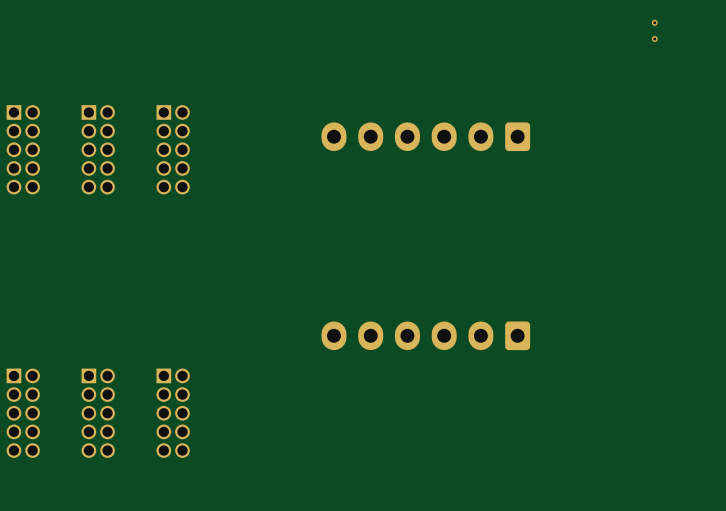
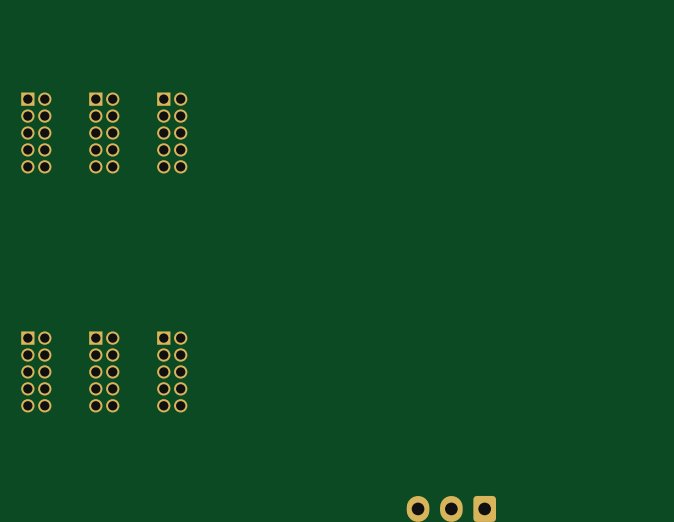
part: (654, 30) -> none
part: (425, 136) -> none
part: (425, 335) -> none

